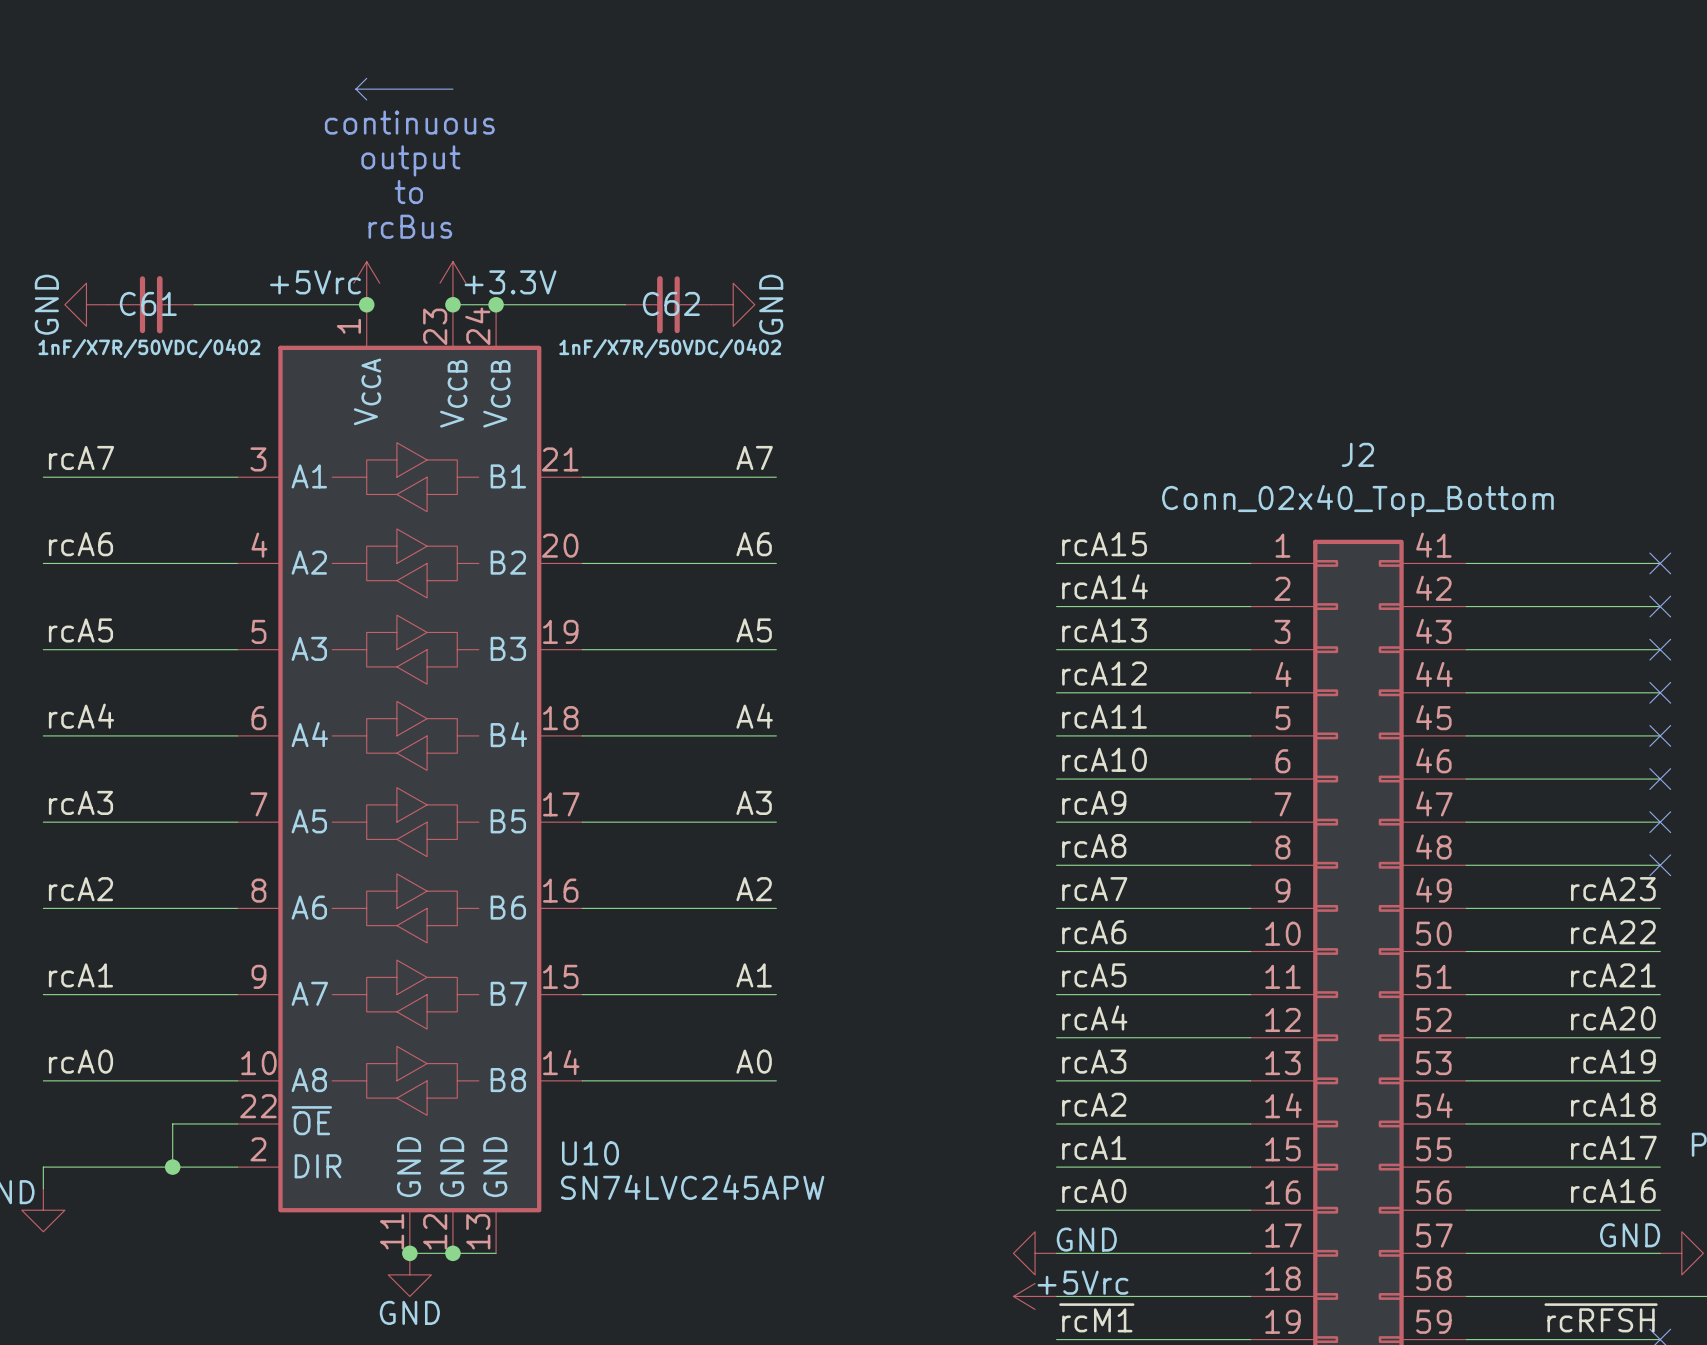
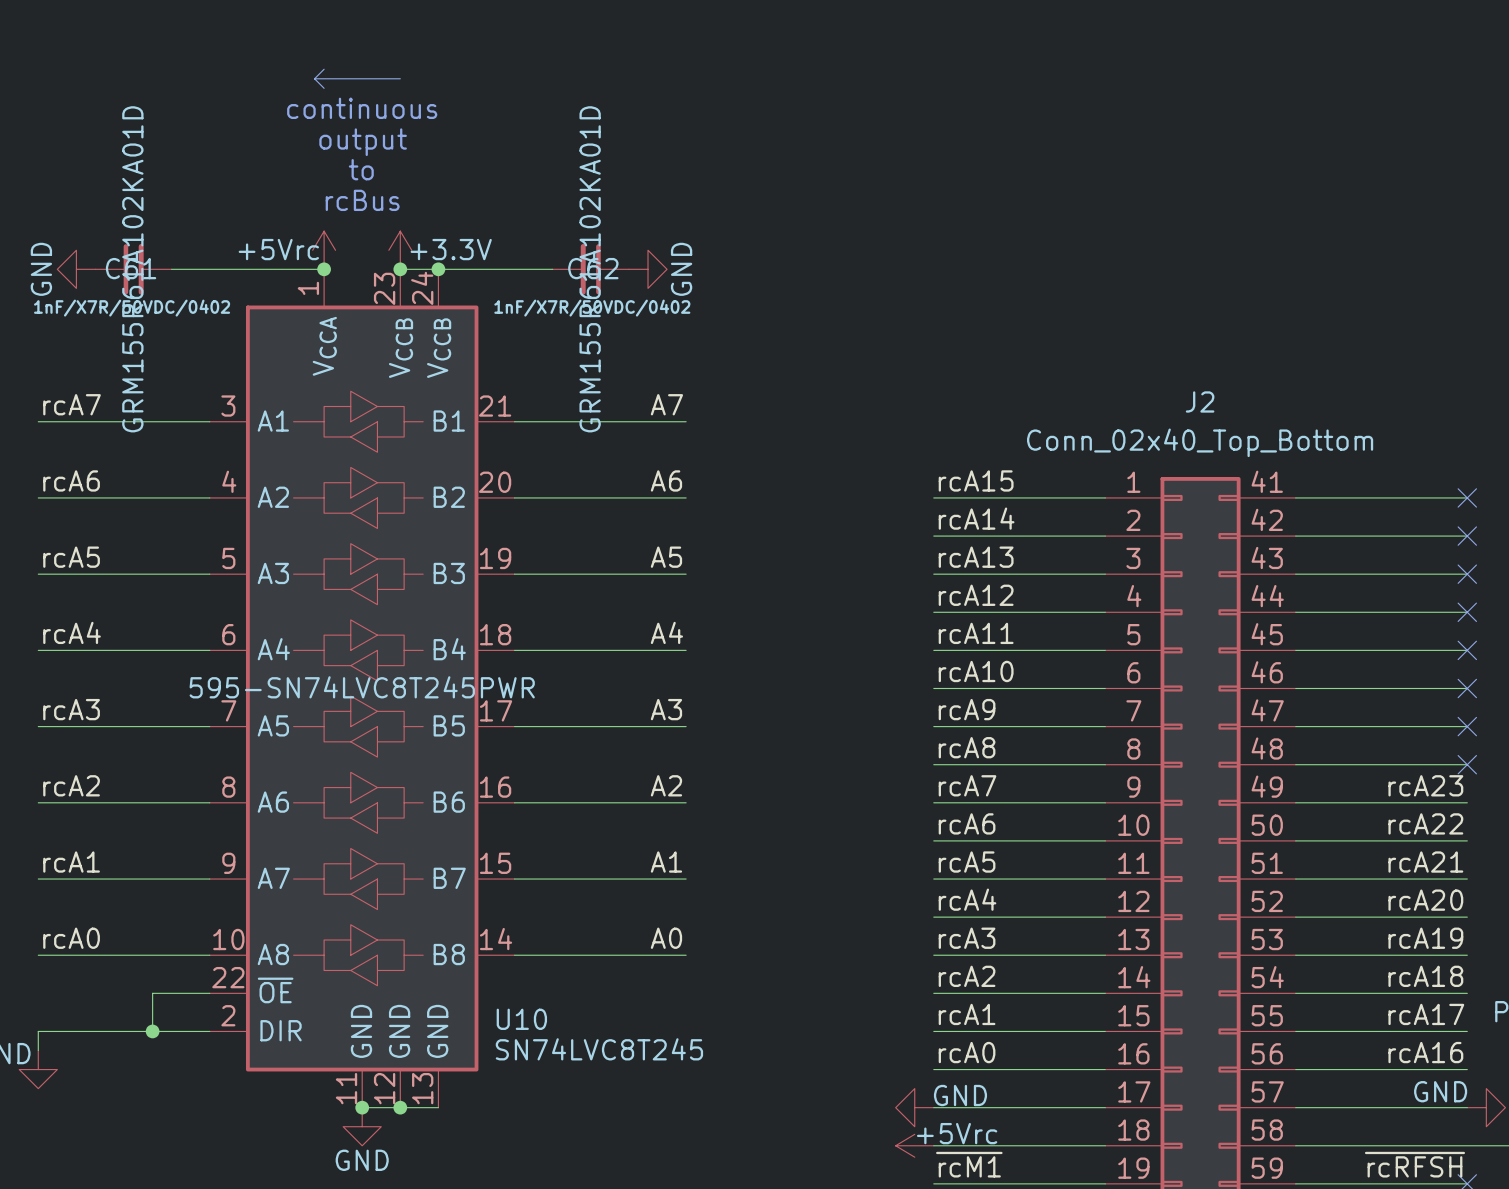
C61 text: none -> GRM155R61A102KA01D (132, 269)
C62 text: none -> GRM155R61A102KA01D (590, 269)
U10 text: none -> 595-SN74LVC8T245PWR (362, 687)
U10 value: SN74LVC245APW (692, 1187) -> SN74LVC8T245 (599, 1049)

